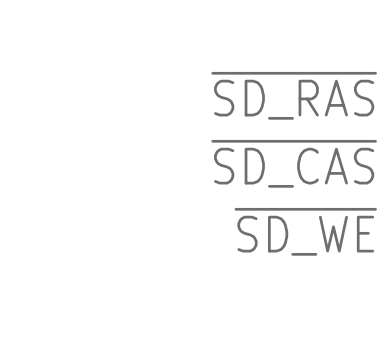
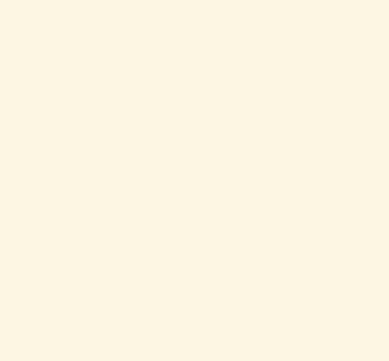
label: ~{SD_RAS} (294, 95) -> none
label: ~{SD_CAS} (294, 163) -> none
label: ~{SD_WE} (305, 231) -> none

